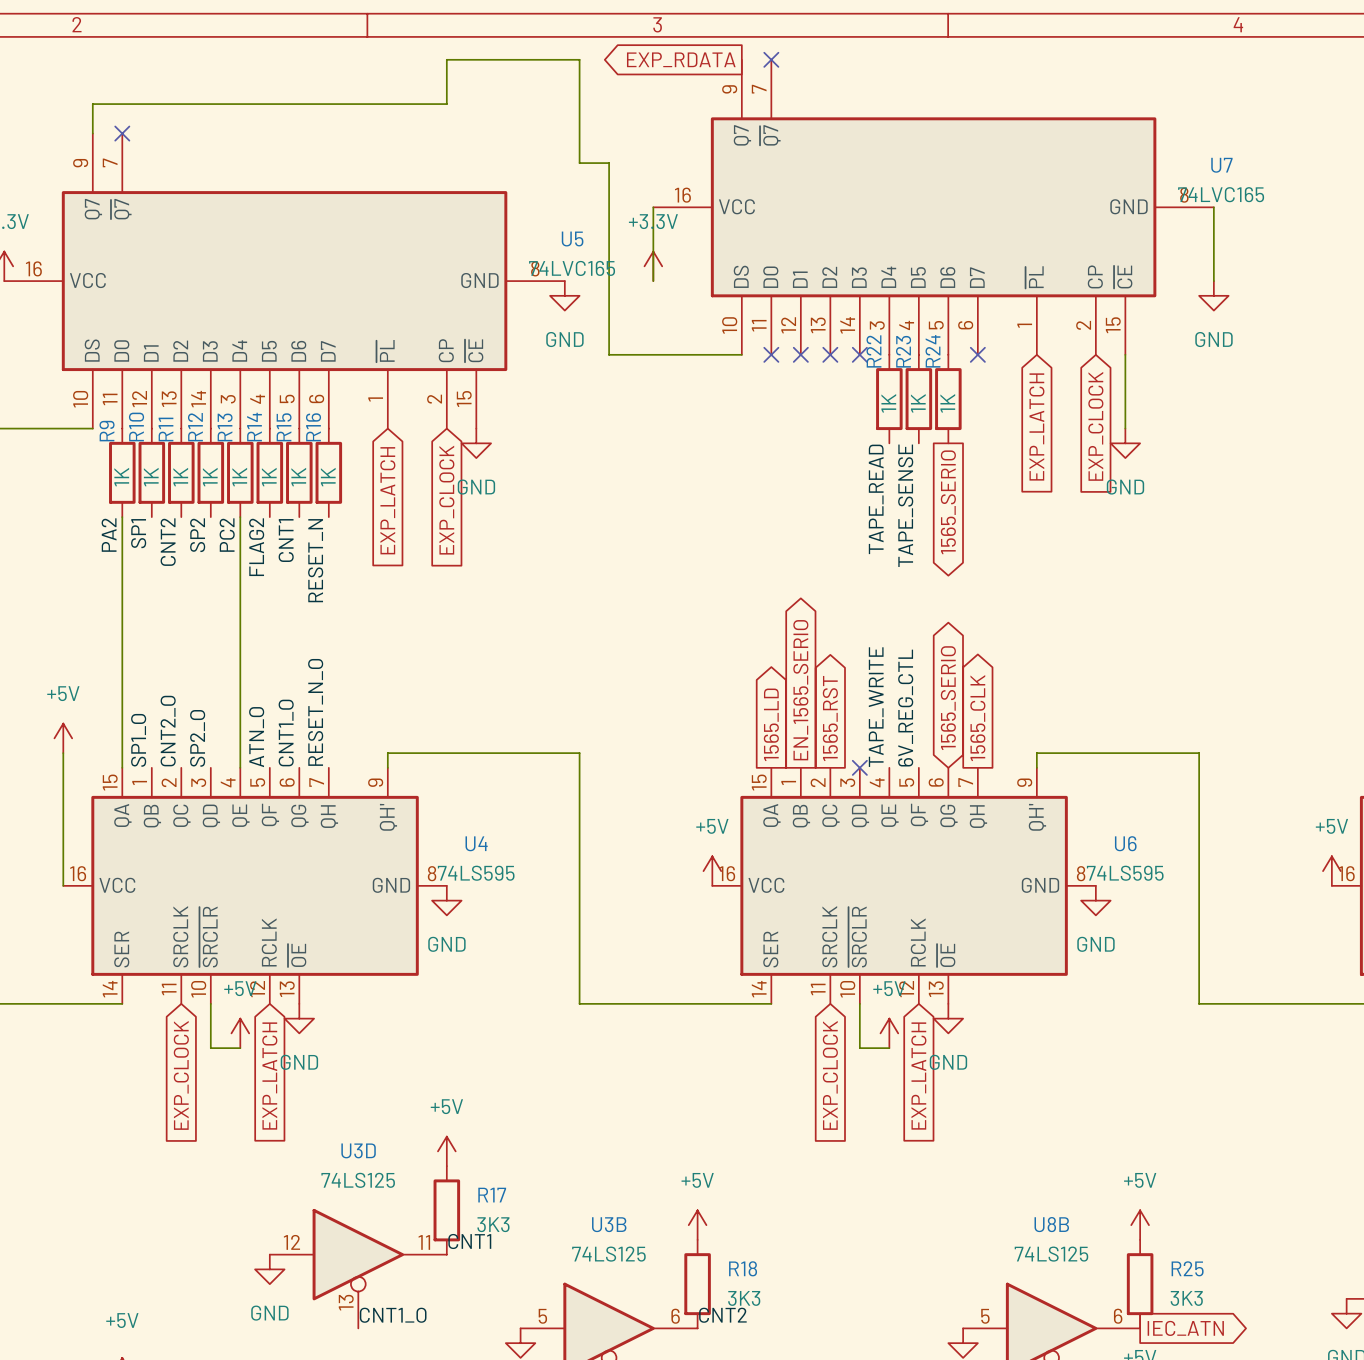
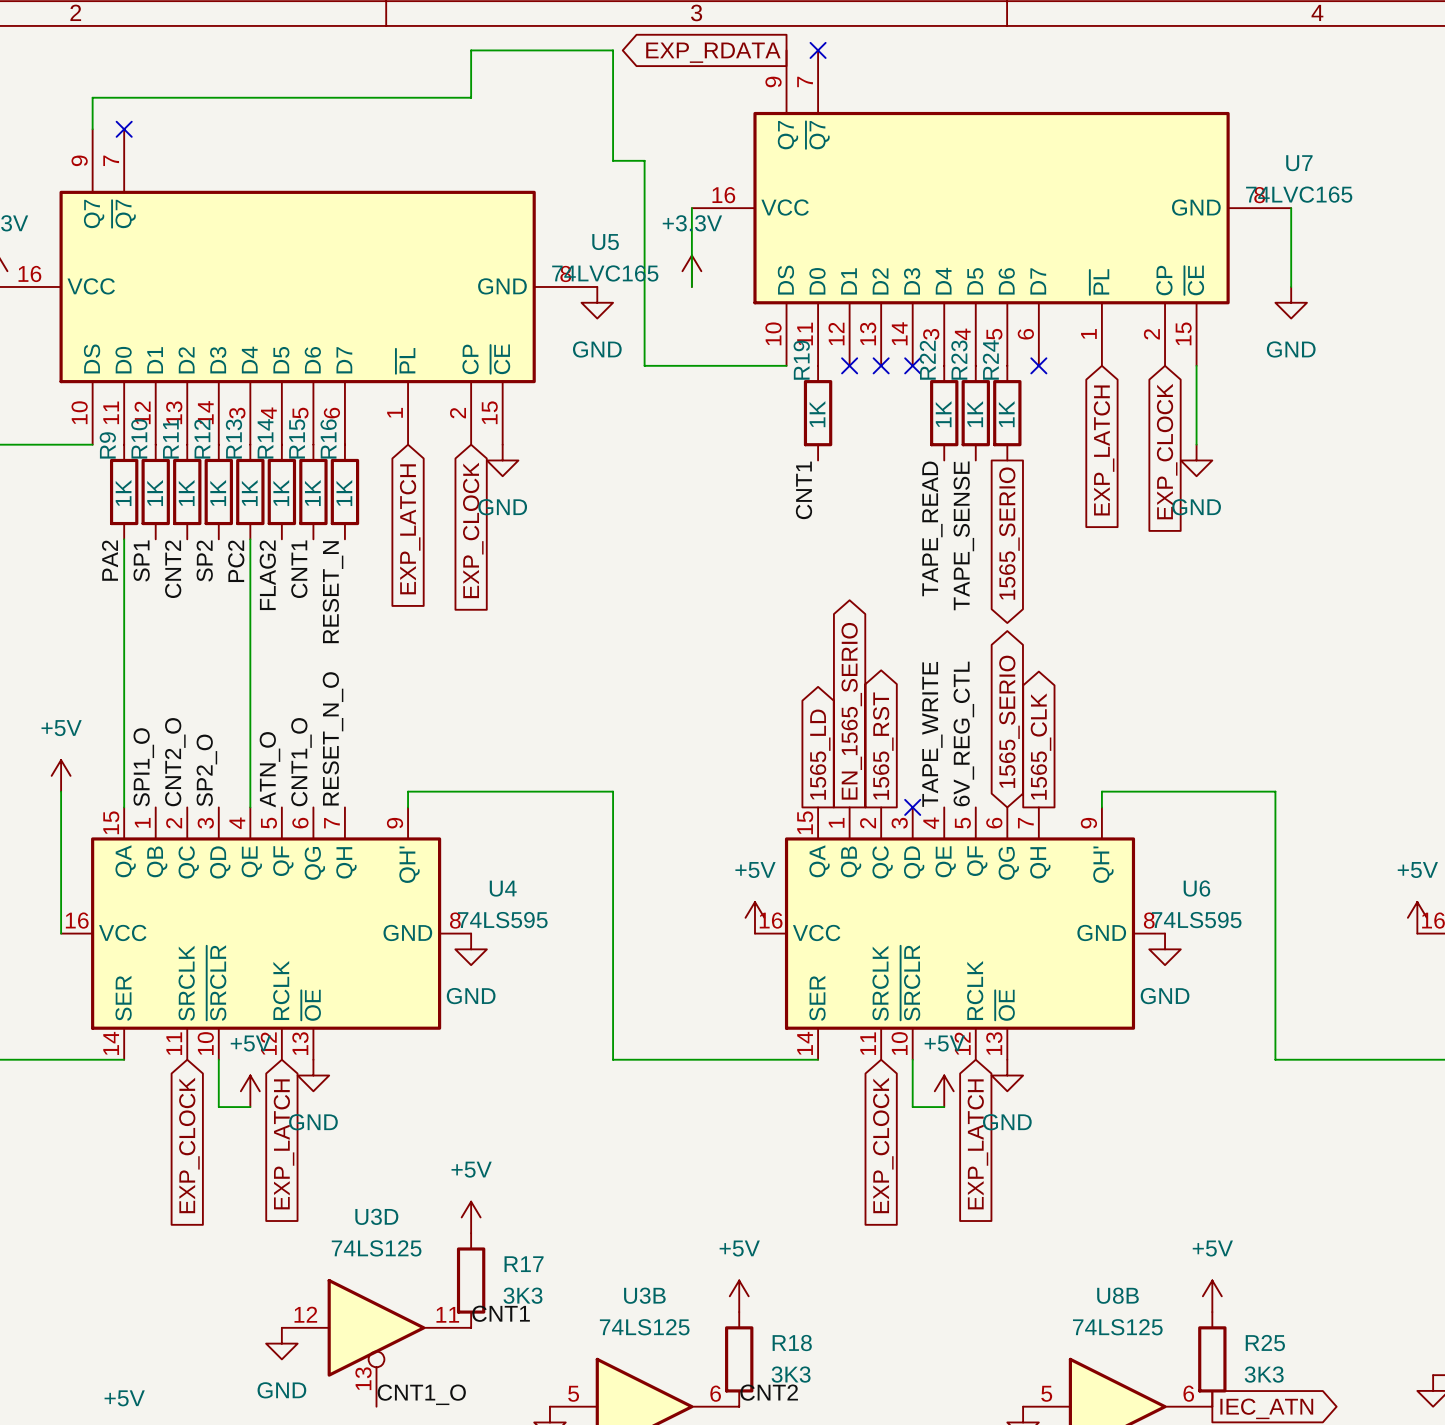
no-connect mark: (771, 354) -> none
R19: none -> 1K (818, 413)
label: none -> CNT1 (803, 490)
label: SP1_O (138, 740) -> SPI1_O (143, 767)

